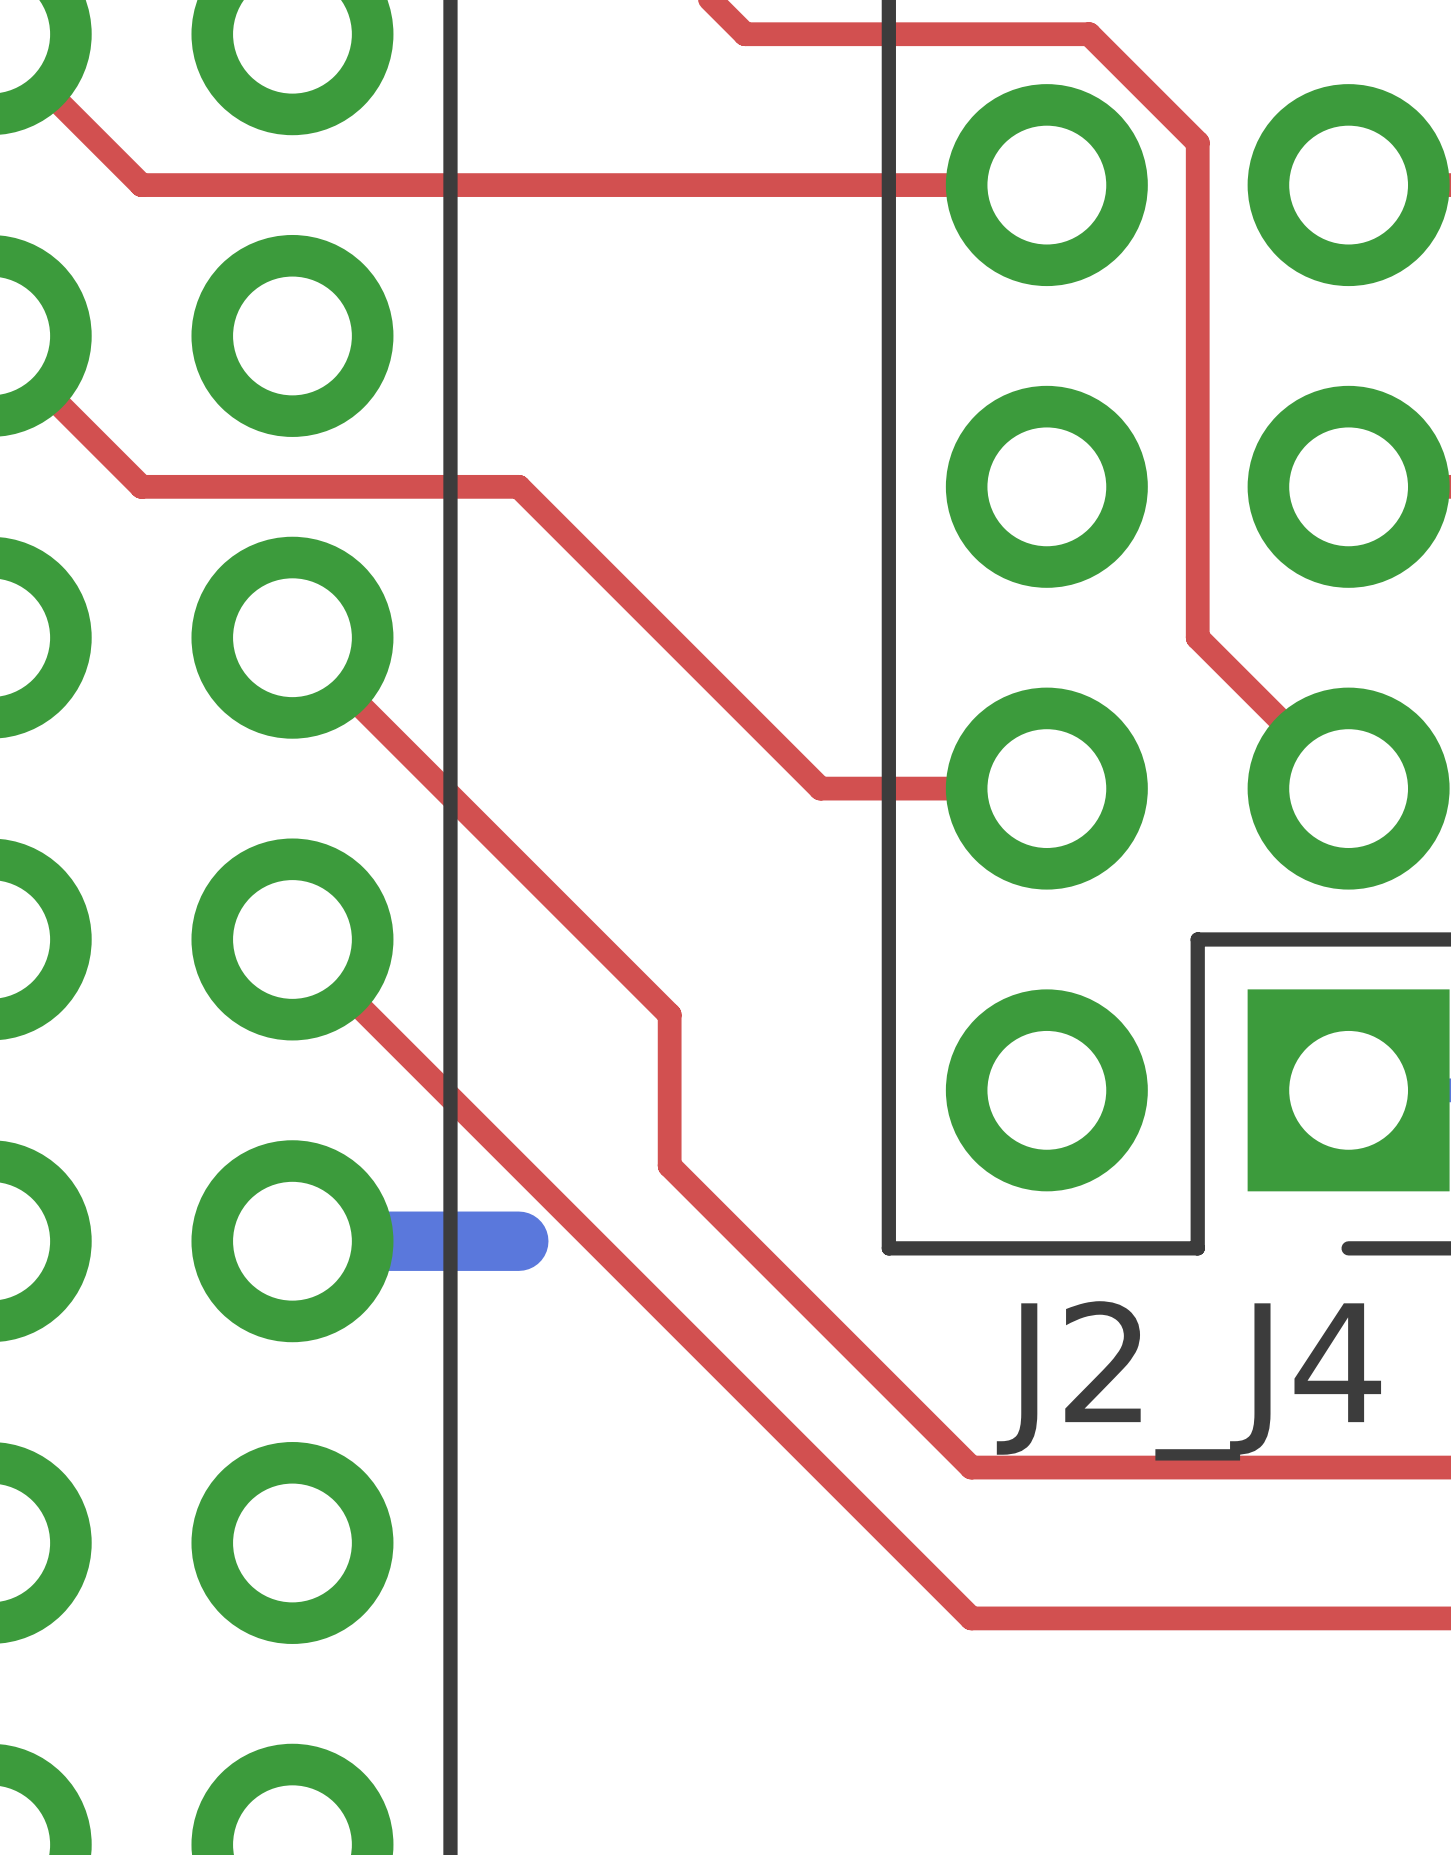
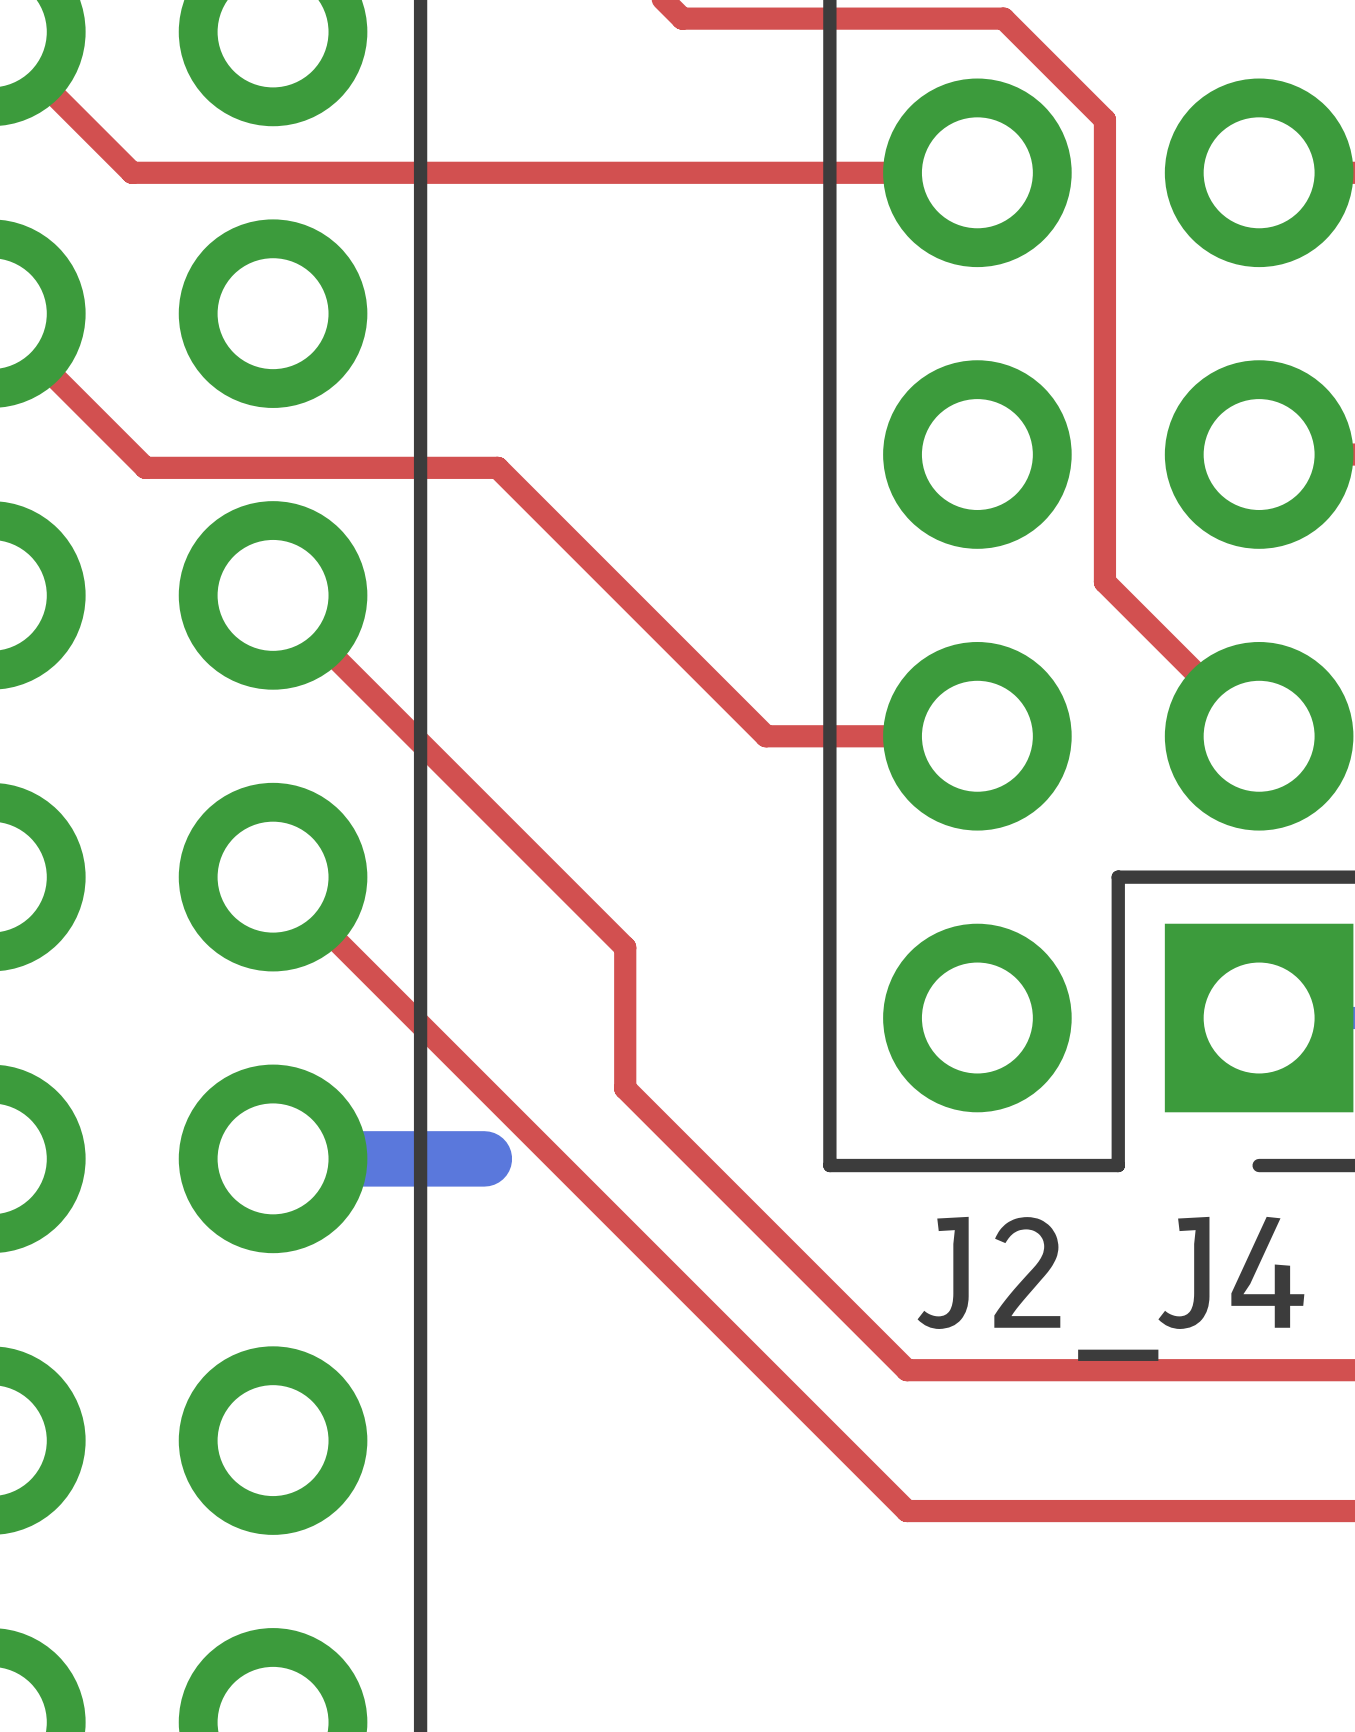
top track: (730, 19) (745, 34) (1089, 34) -> (682, 18) (1003, 18) (1016, 31)
top track: (1183, 128) (1197, 142) (1197, 637) -> (1104, 119) (1104, 582) (1118, 595)
top track: (141, 486) (518, 486) (533, 501) -> (132, 454) (145, 467) (497, 467)

